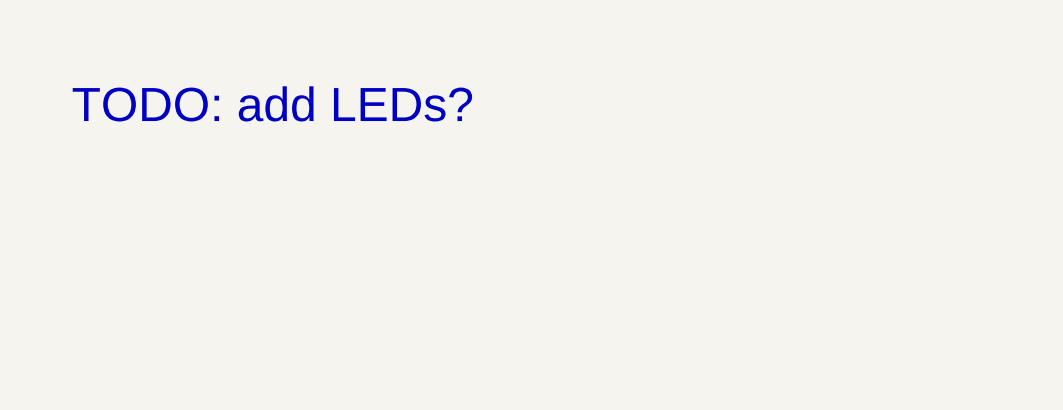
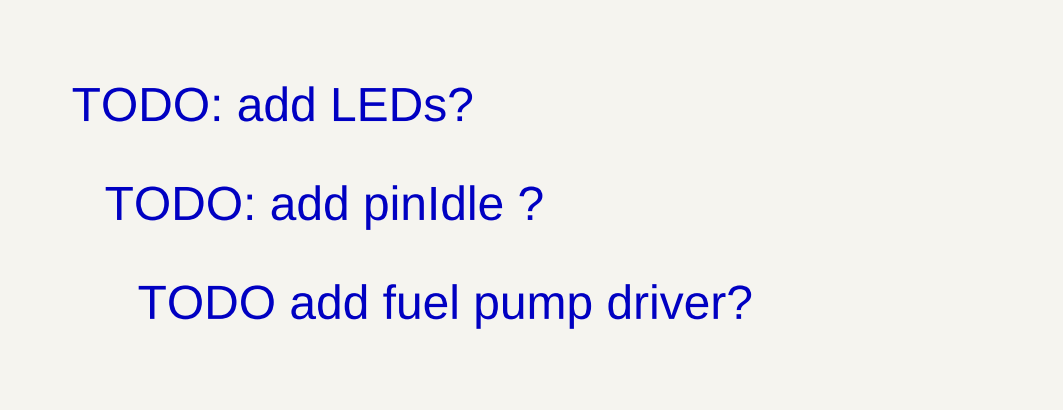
text: none -> TODO: add pinIdle ? (324, 207)
text: none -> TODO add fuel pump driver? (444, 306)

